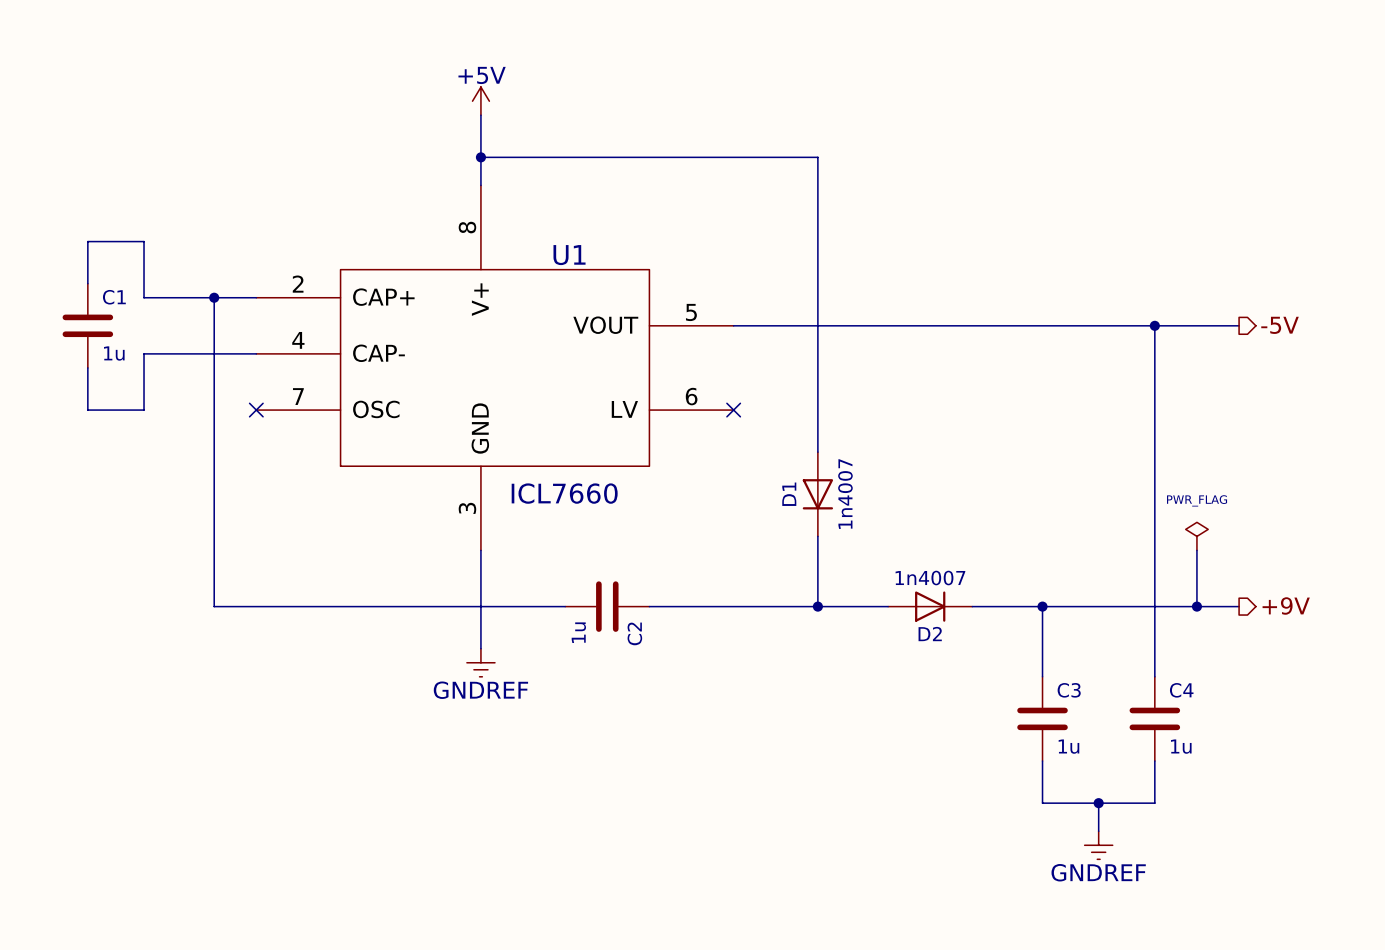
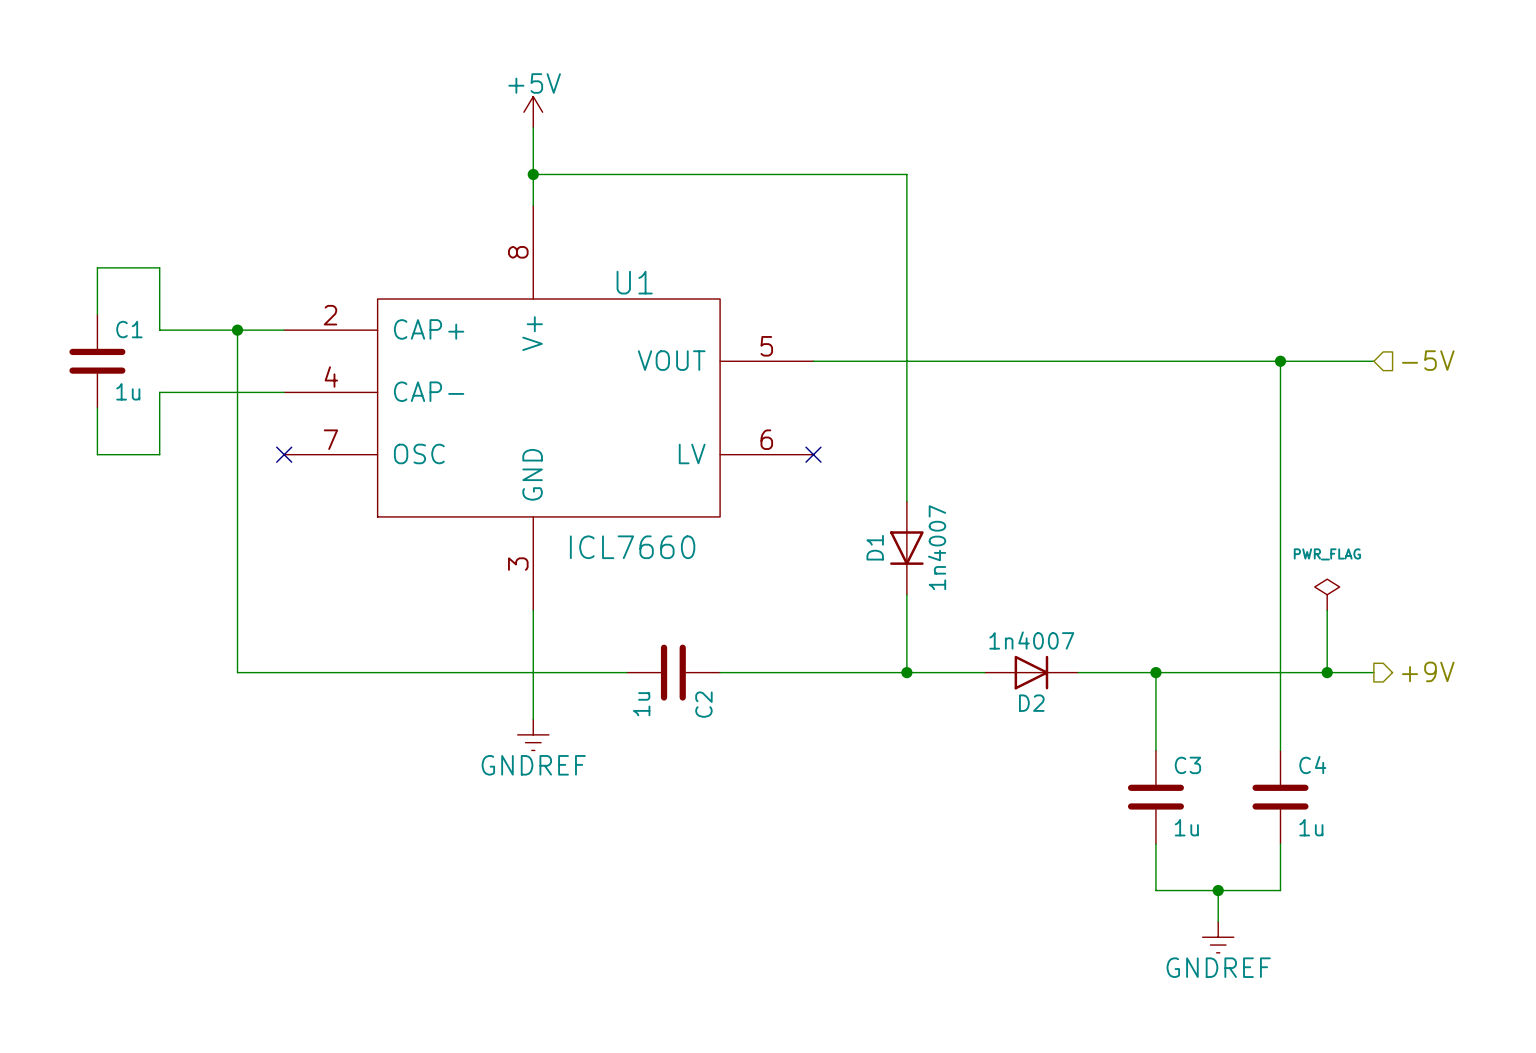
hierarchical label shape: output (1280, 325) -> input (1428, 360)

